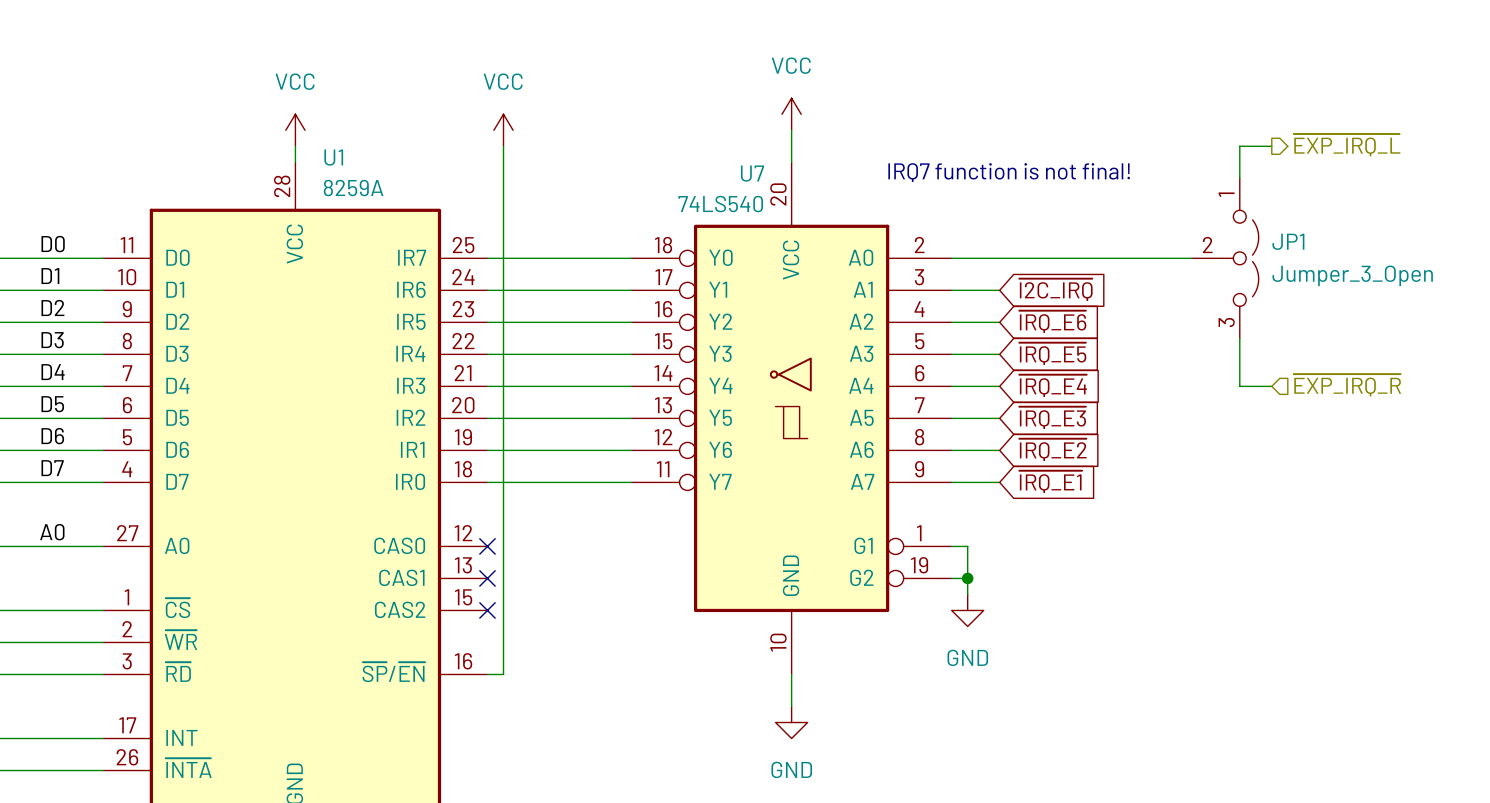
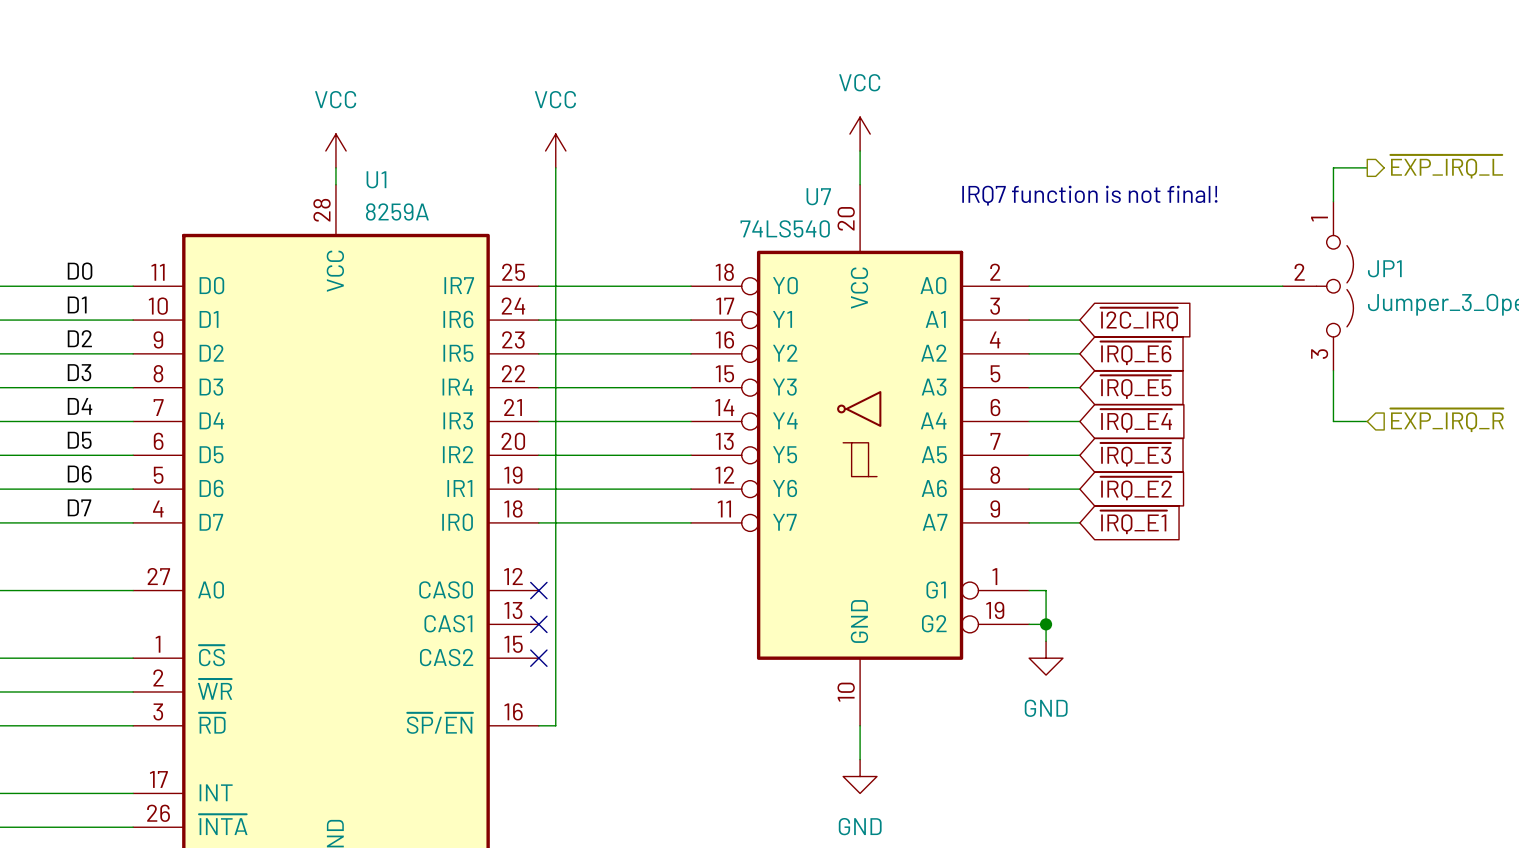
label: A0 (52, 532) -> none

